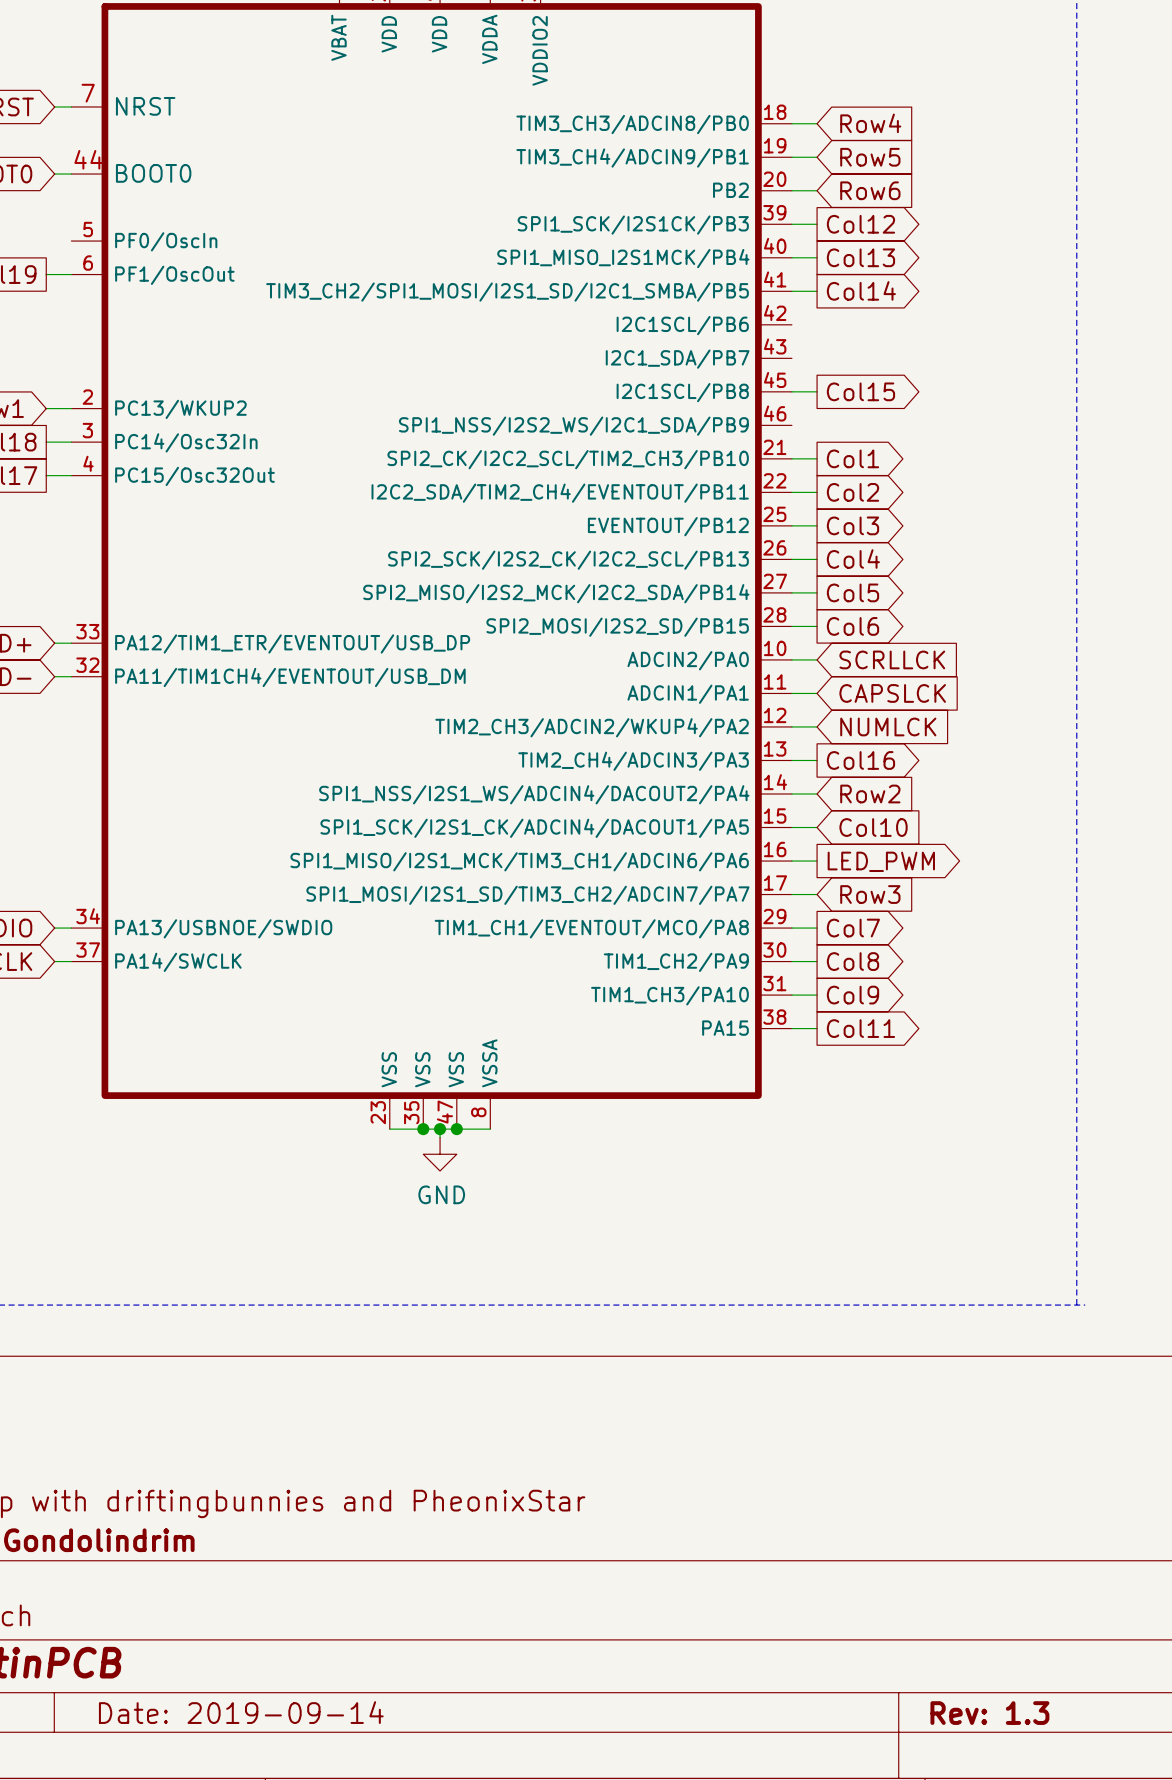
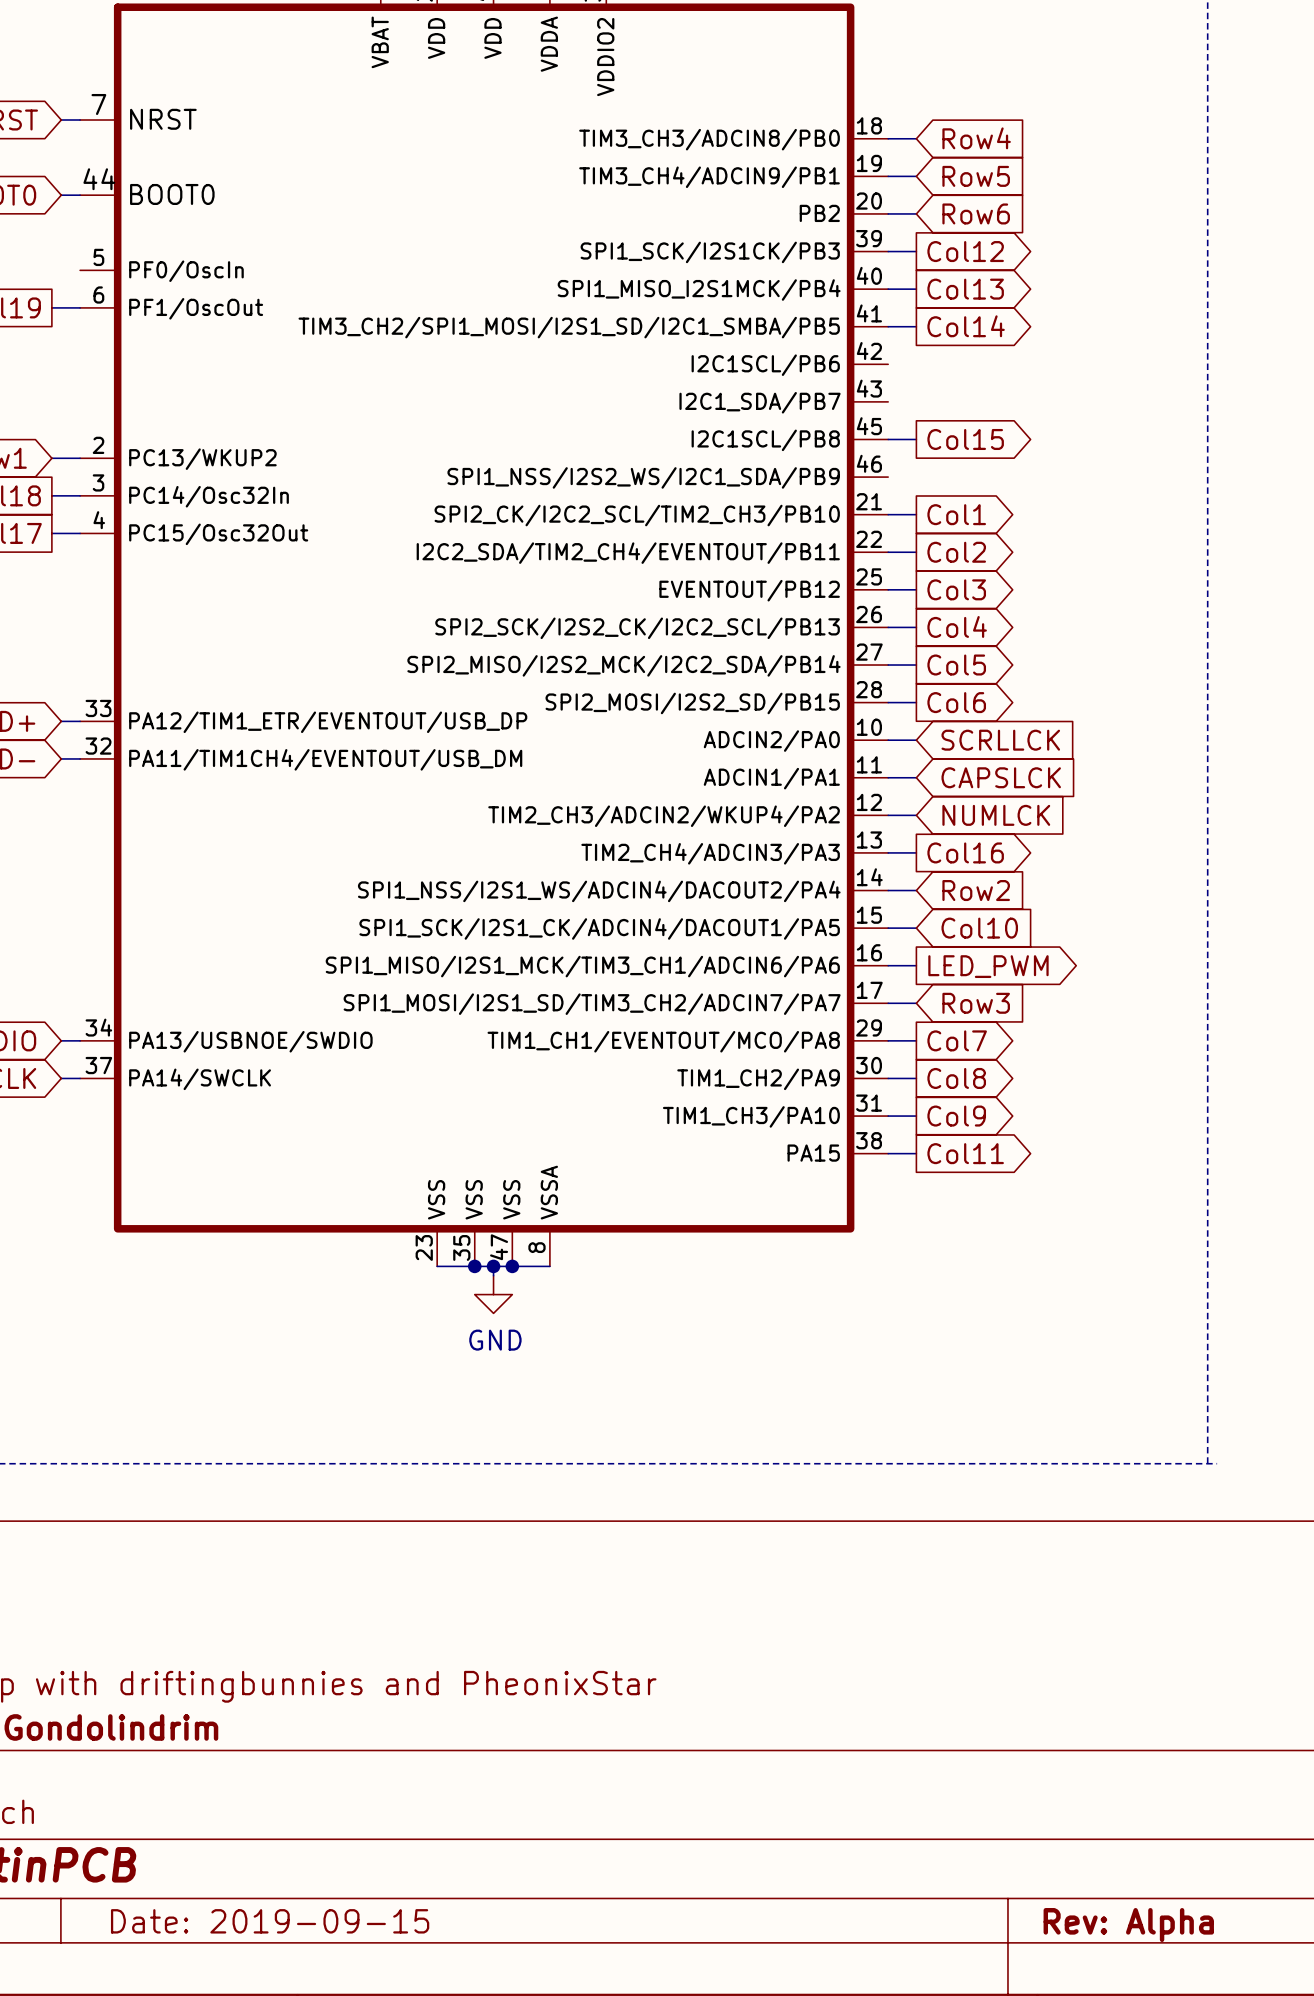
title block: Date: 2019-09-14 (241, 1712) -> Date: 2019-09-15 (270, 1921)
title block: Rev: 1.3 (989, 1713) -> Rev: Alpha (1128, 1925)

